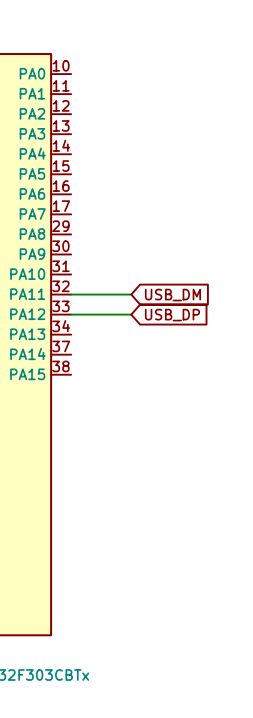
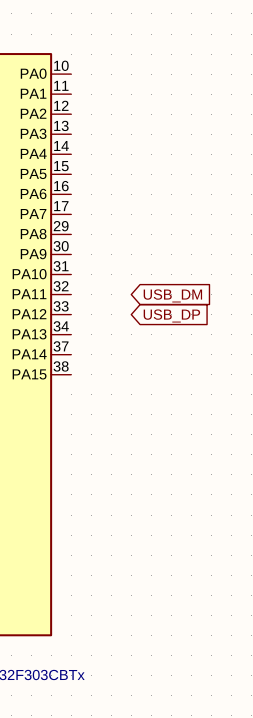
wire: (71, 294) (131, 294) -> none
wire: (71, 314) (131, 314) -> none

